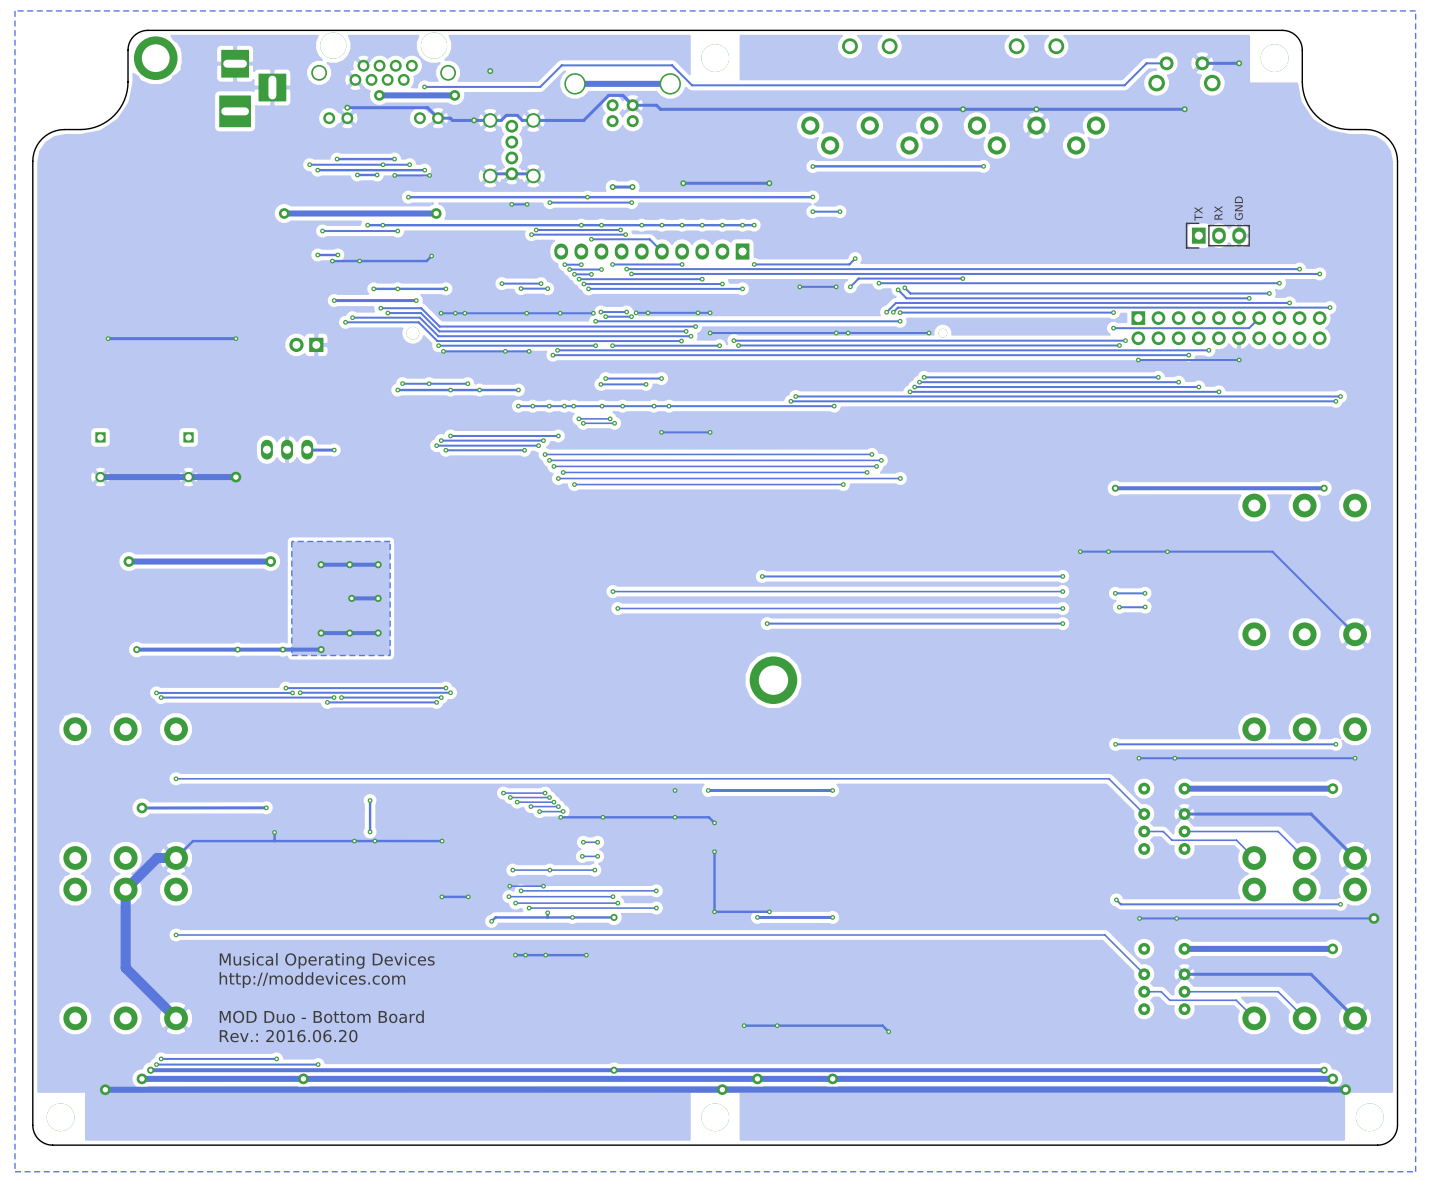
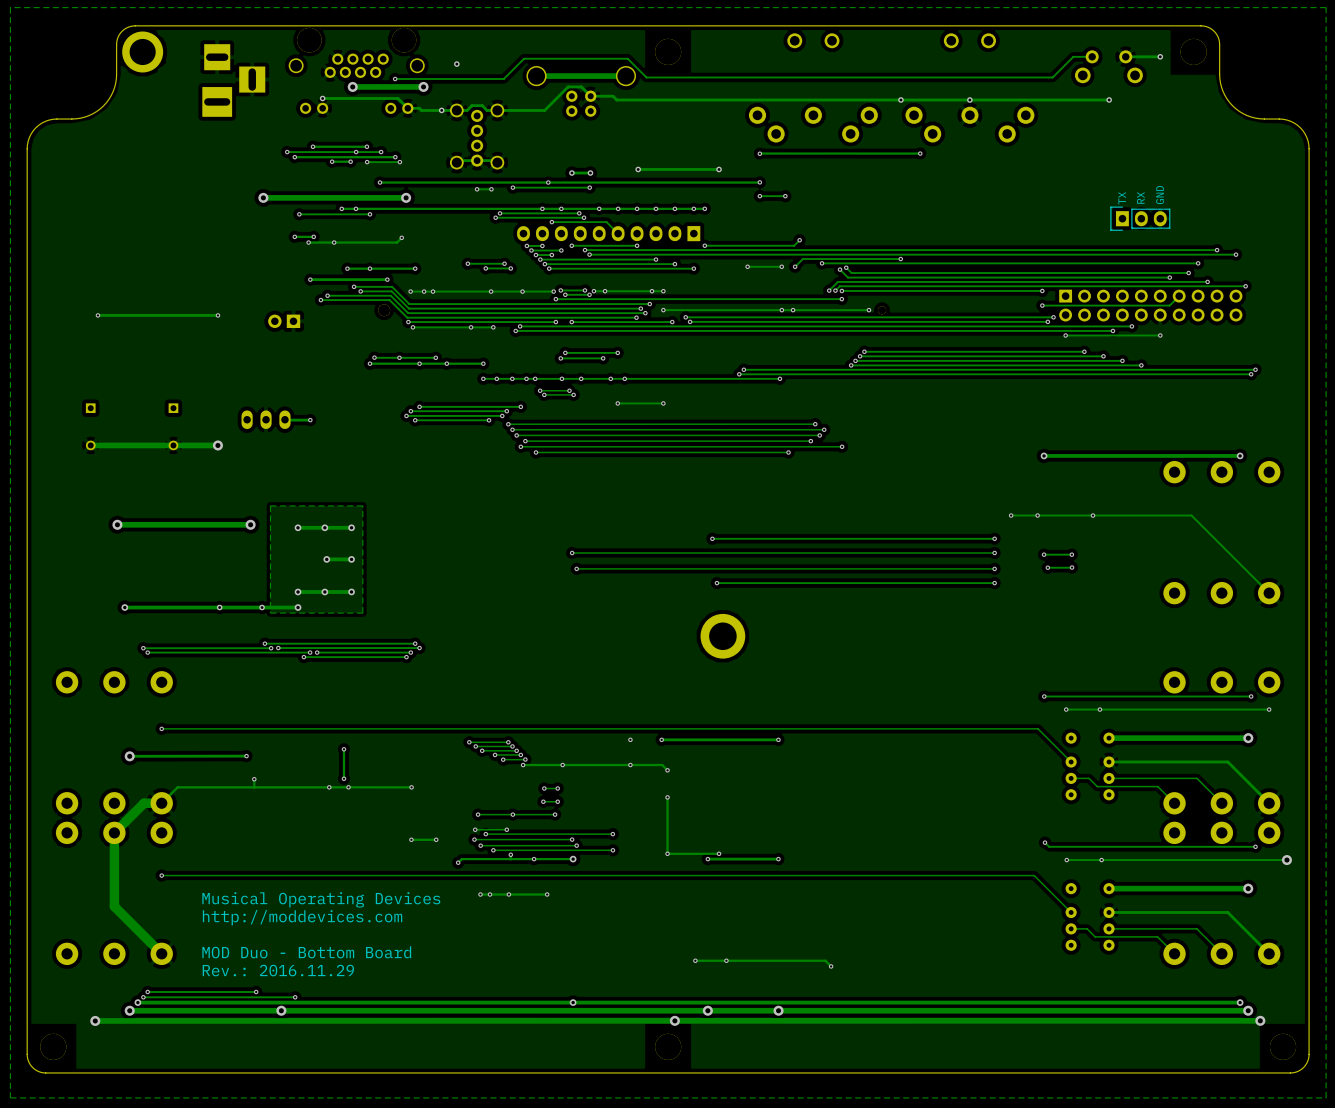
text: Rev.: 2016.06.20 (288, 1036) -> Rev.: 2016.11.29 (278, 970)

